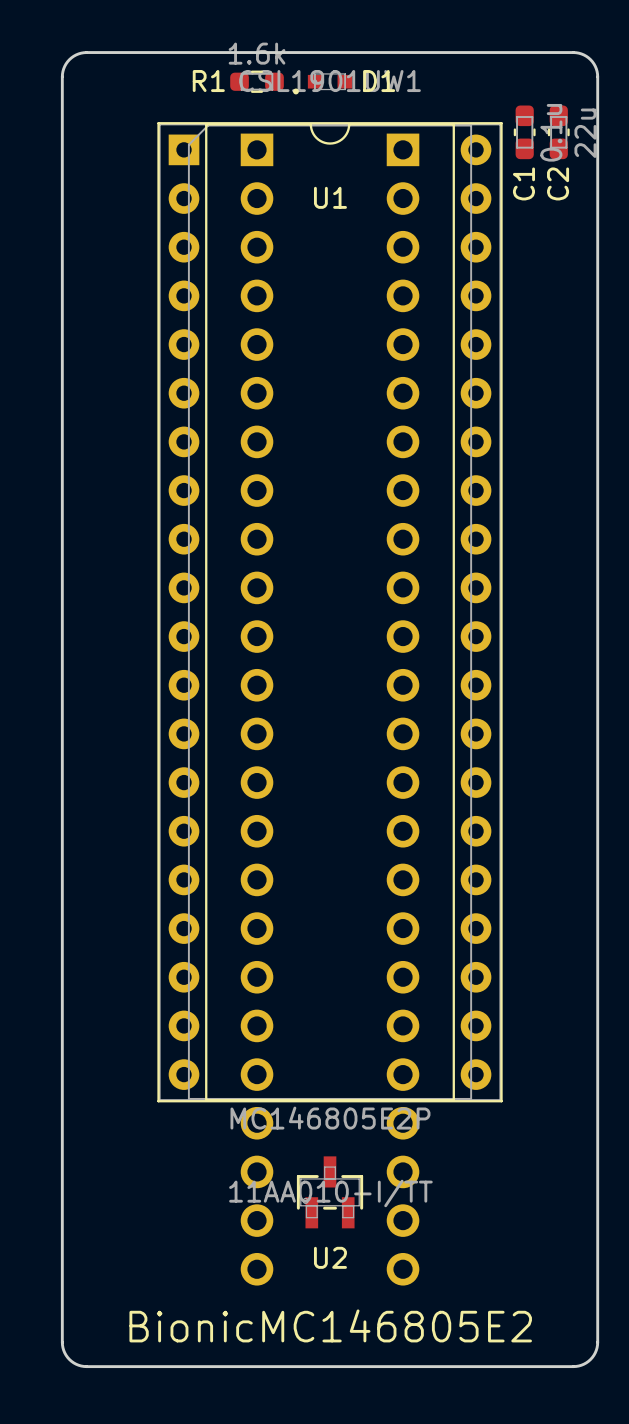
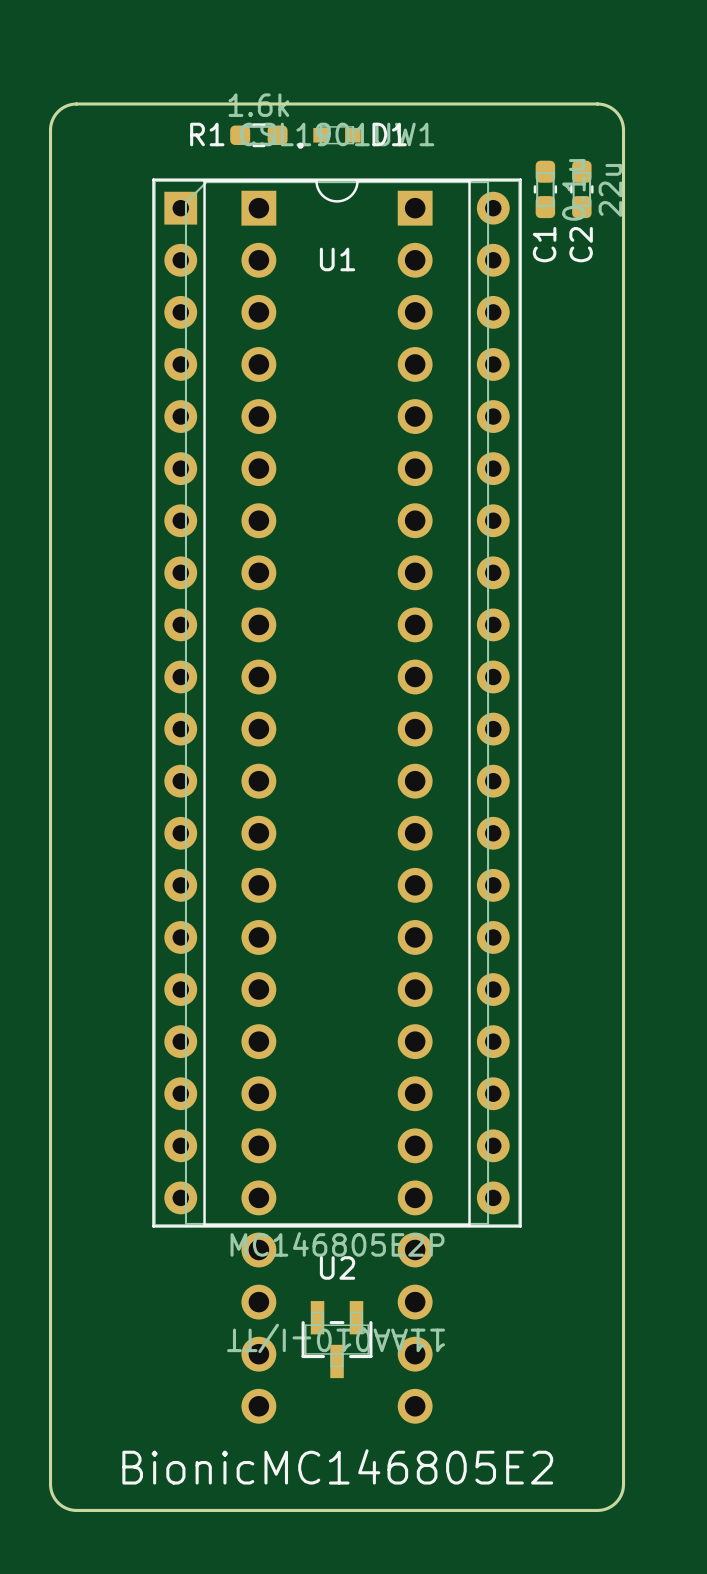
U2 rotation: 0° (330, 1192) -> 180° (337, 1339)

